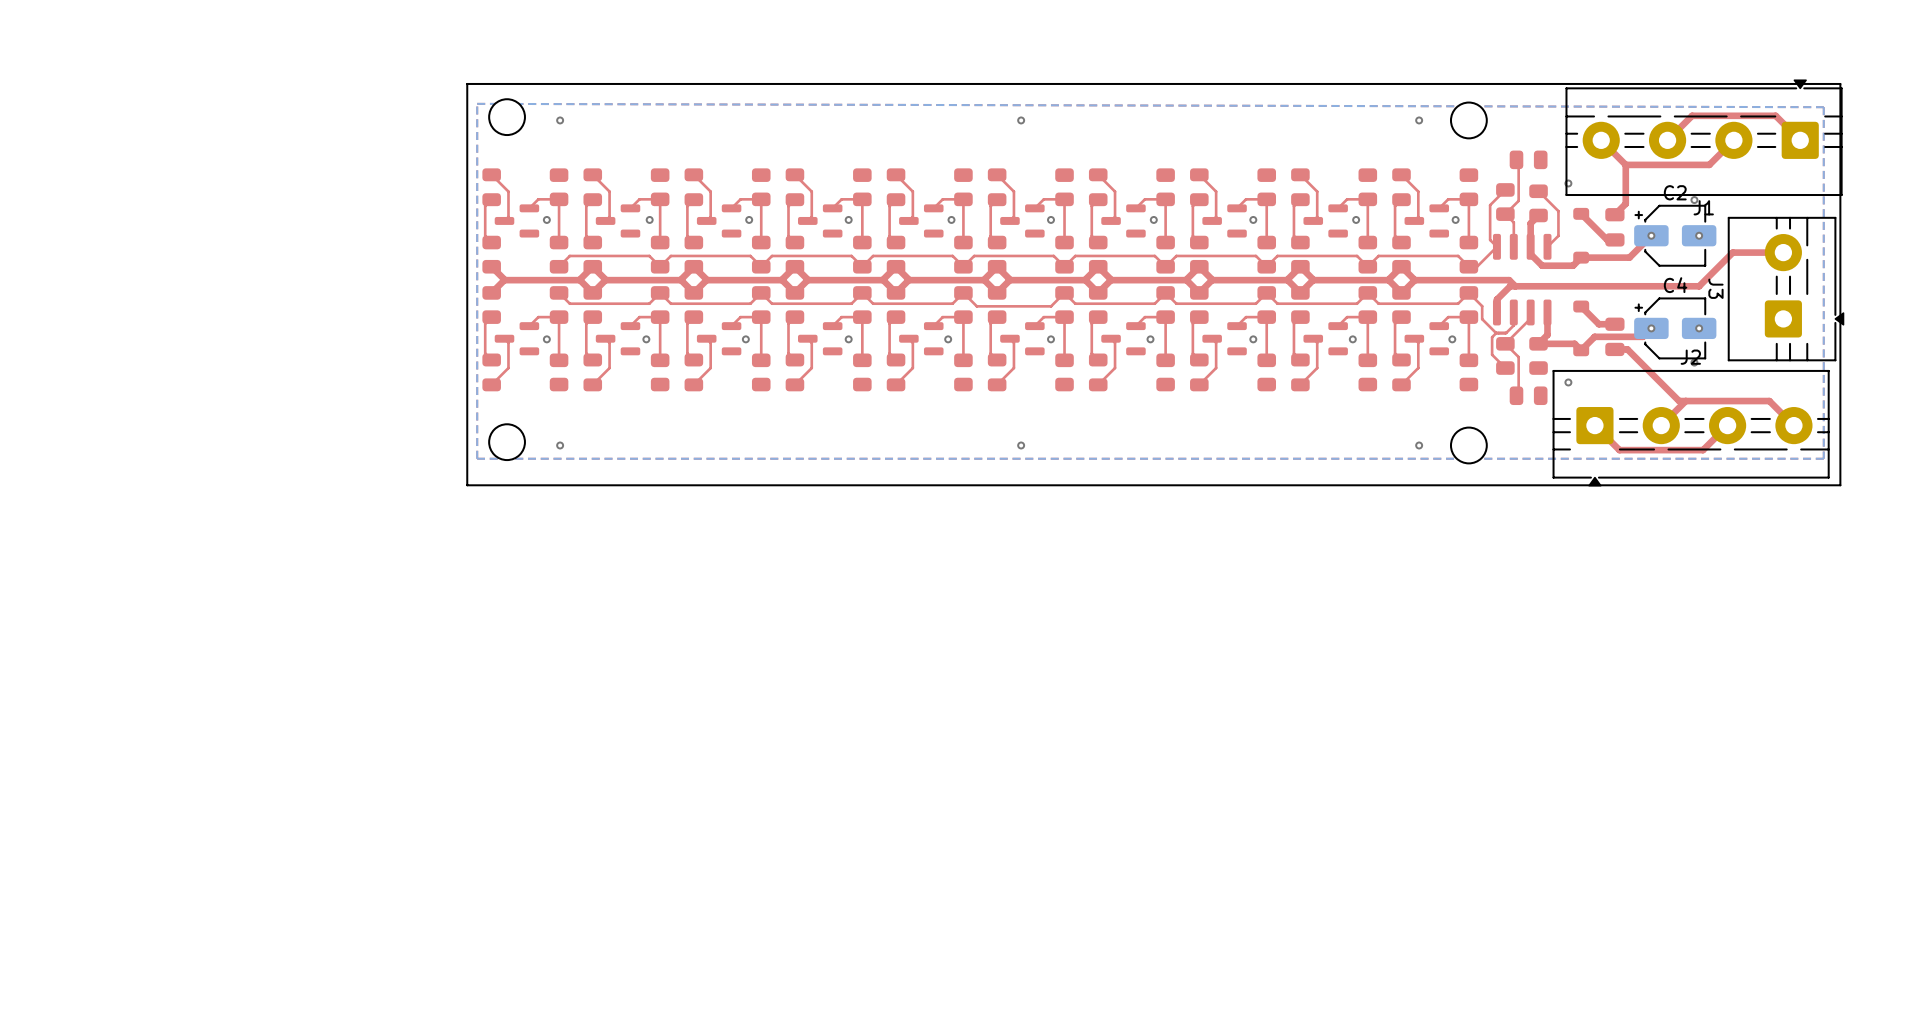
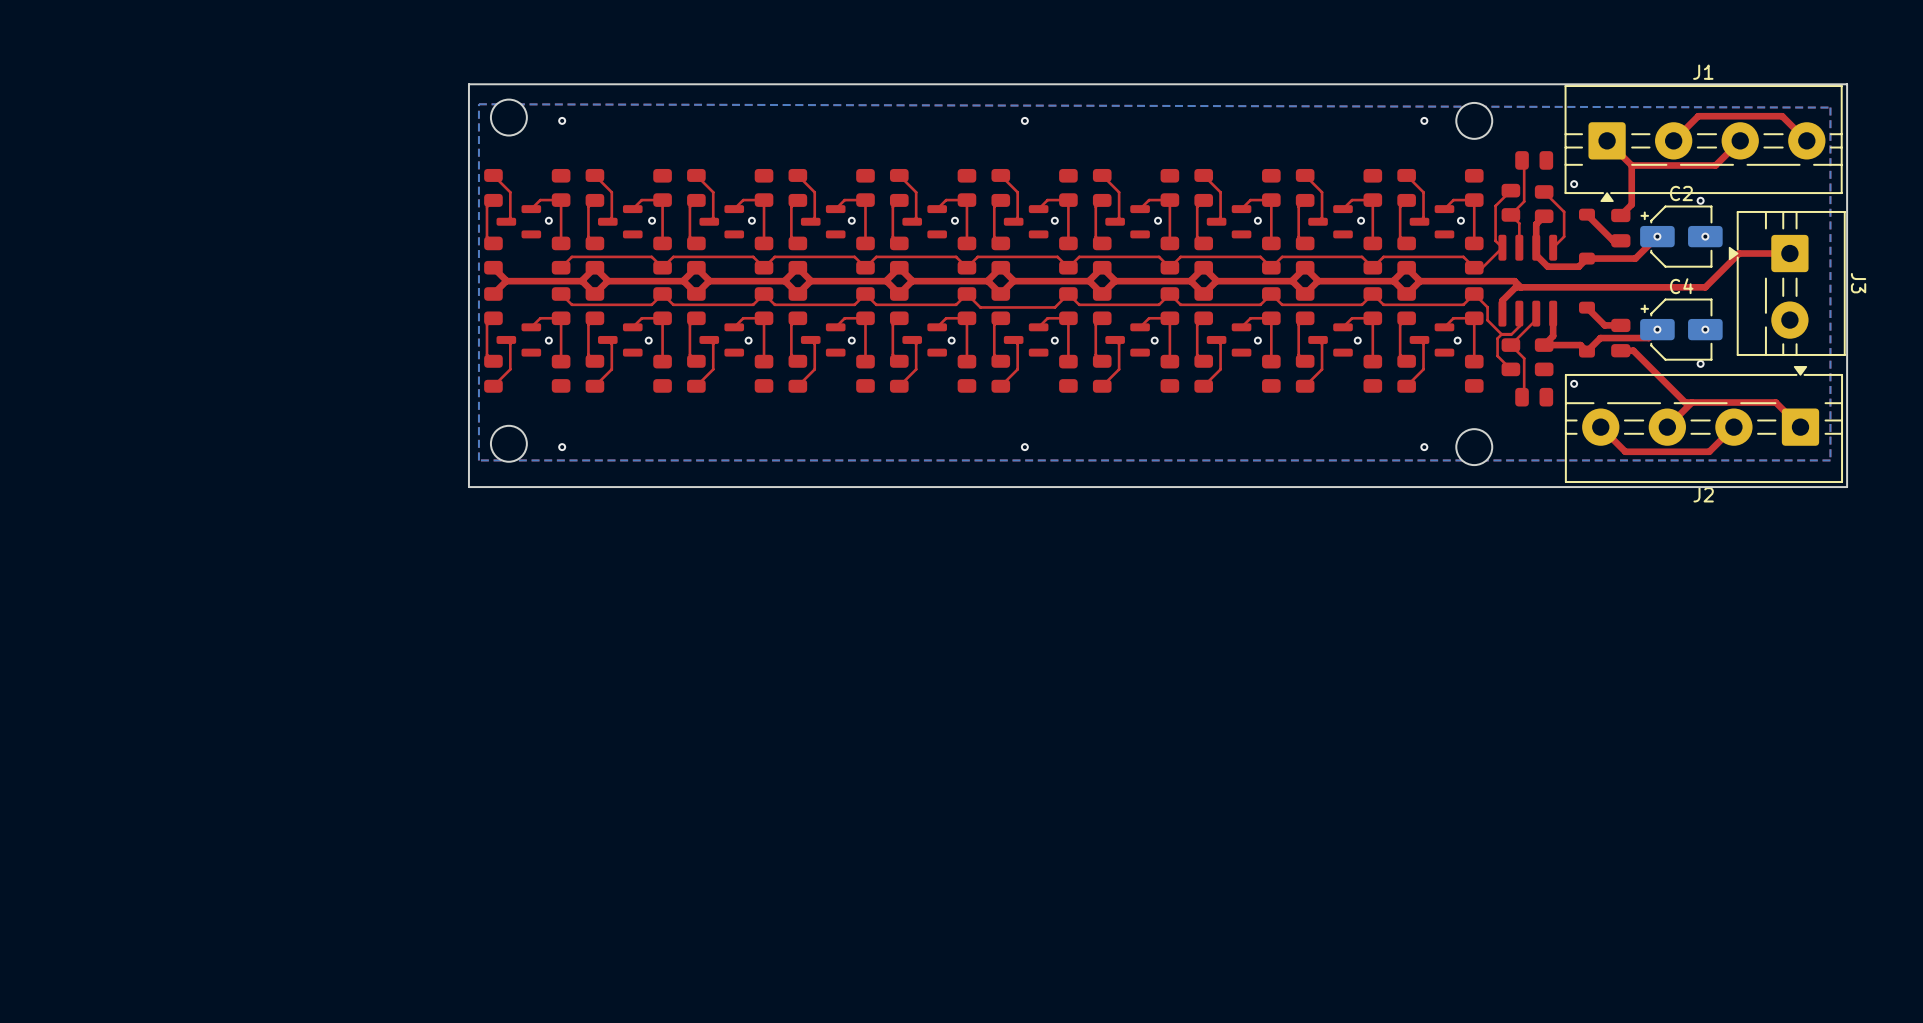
J1 rotation: 0° (1704, 137) -> 180° (1703, 143)
J3 rotation: 0° (1786, 289) -> 180° (1787, 283)
J2 rotation: 0° (1691, 428) -> 180° (1703, 424)

